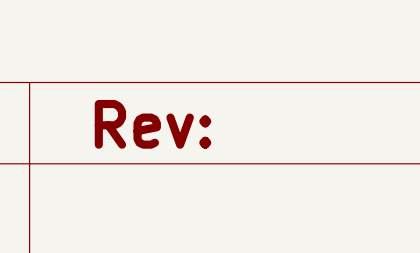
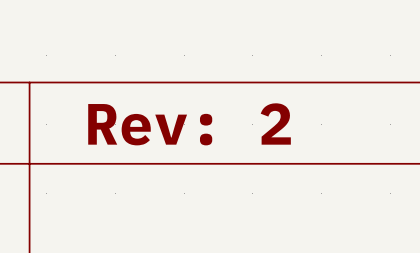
title block: Rev: (153, 124) -> Rev: 2 (189, 124)

